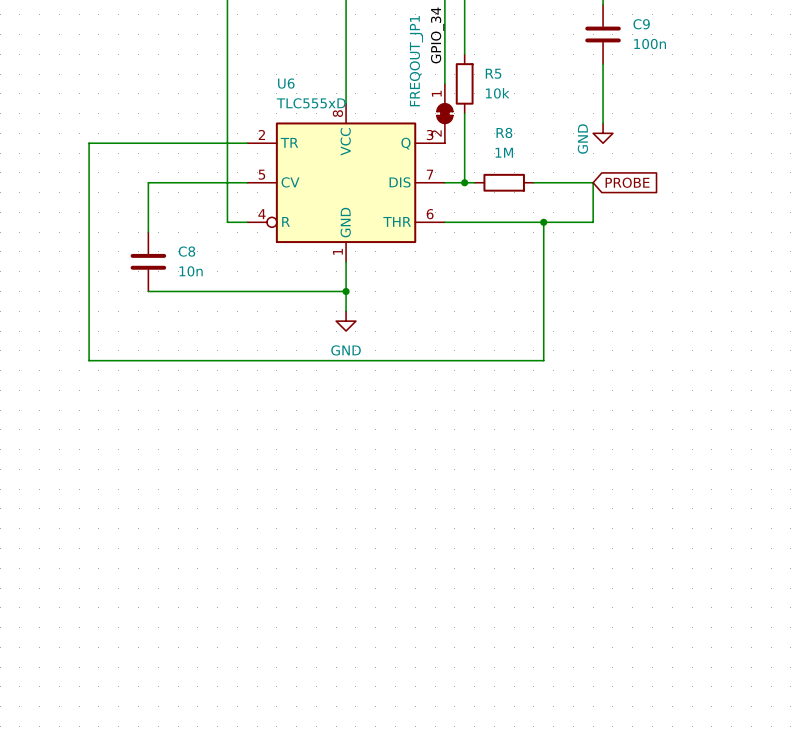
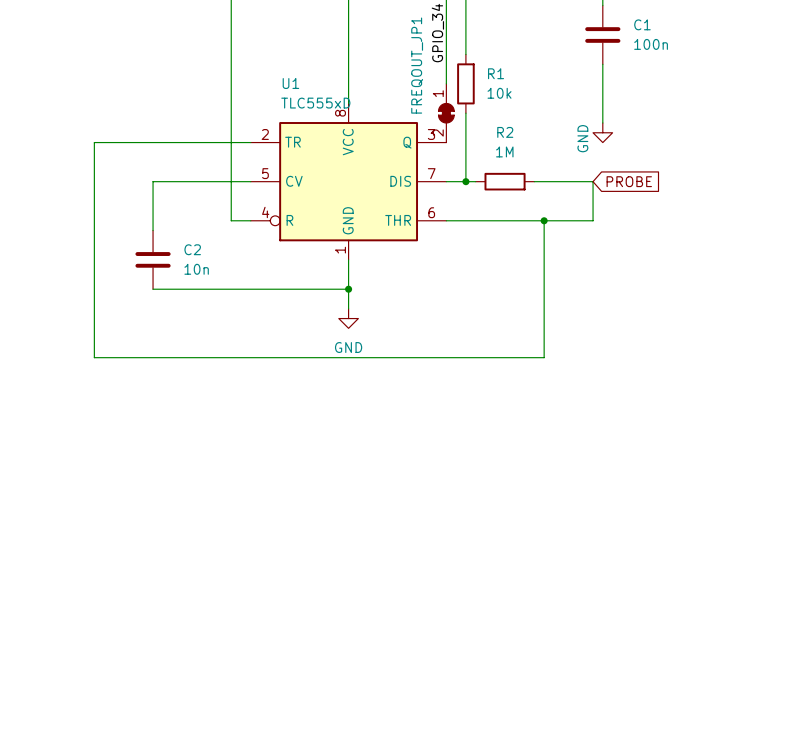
C9 name: C9 (641, 24) -> C1 (642, 24)
R5 name: R5 (493, 73) -> R1 (496, 73)
U6 name: U6 (286, 83) -> U1 (290, 83)
R8 name: R8 (504, 132) -> R2 (505, 132)
C8 name: C8 (186, 251) -> C2 (192, 249)

